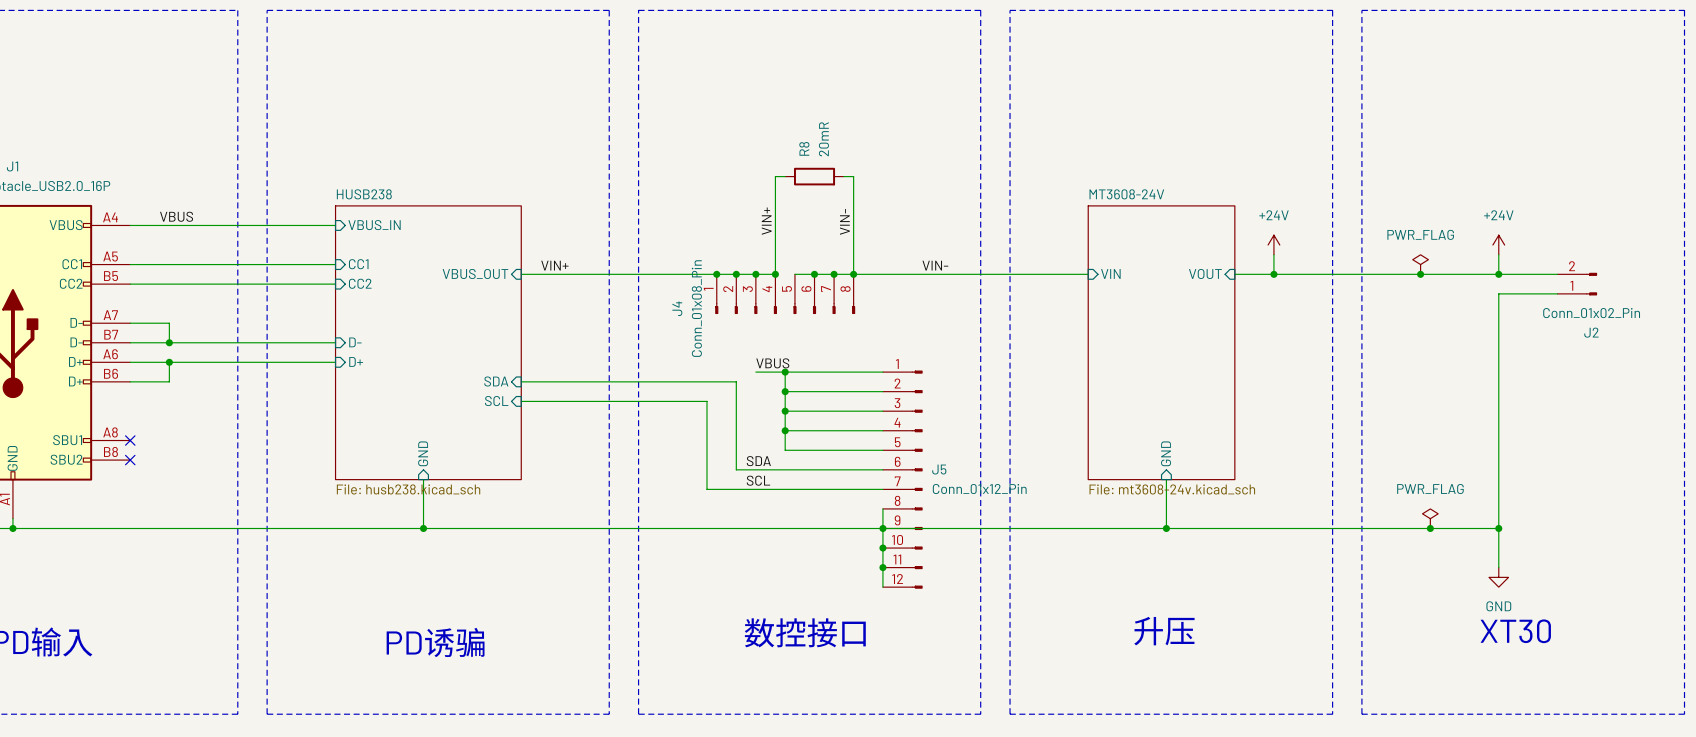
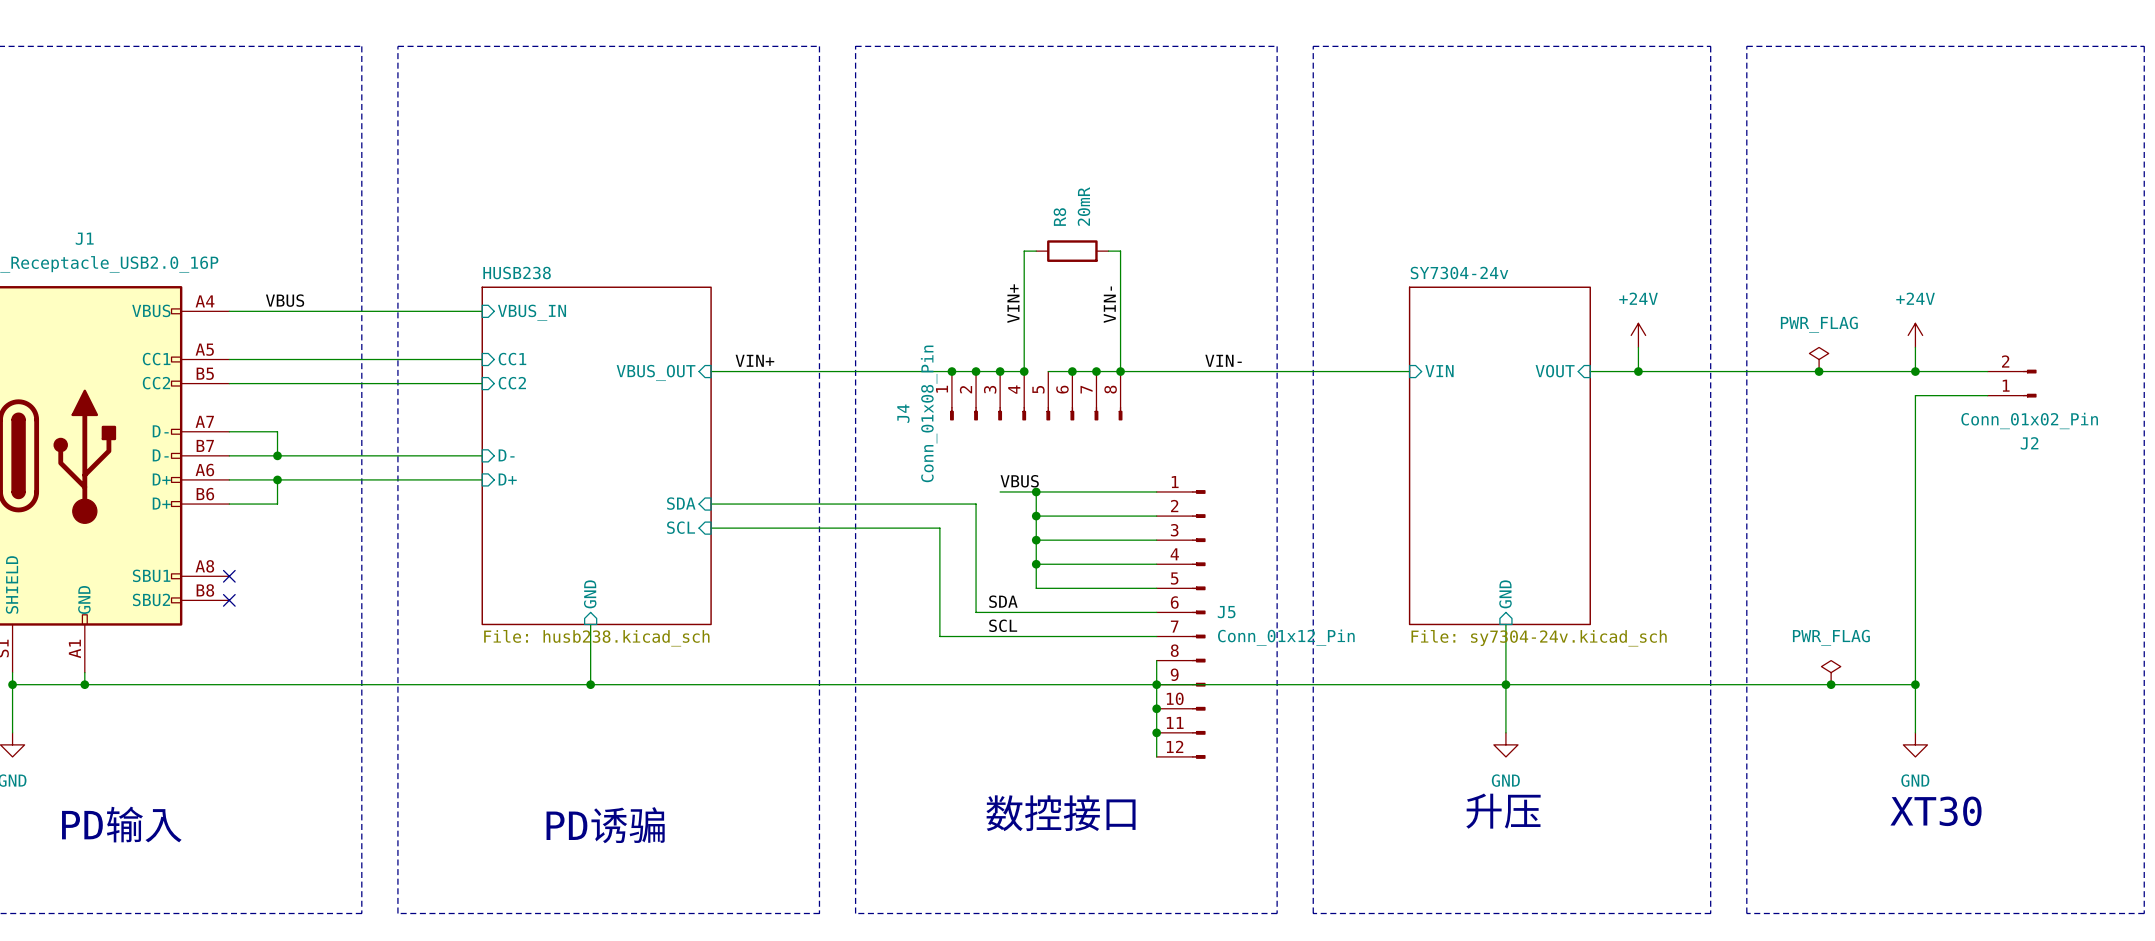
sheet MT3608-24V name: MT3608-24V (1126, 194) -> SY7304-24v (1459, 273)
sheet MT3608-24V value: File: mt3608-24v.kicad_sch (1172, 489) -> File: sy7304-24v.kicad_sch (1539, 638)
wire: none -> (1505, 684) (1505, 732)
power symbol: none -> GND (1505, 744)

